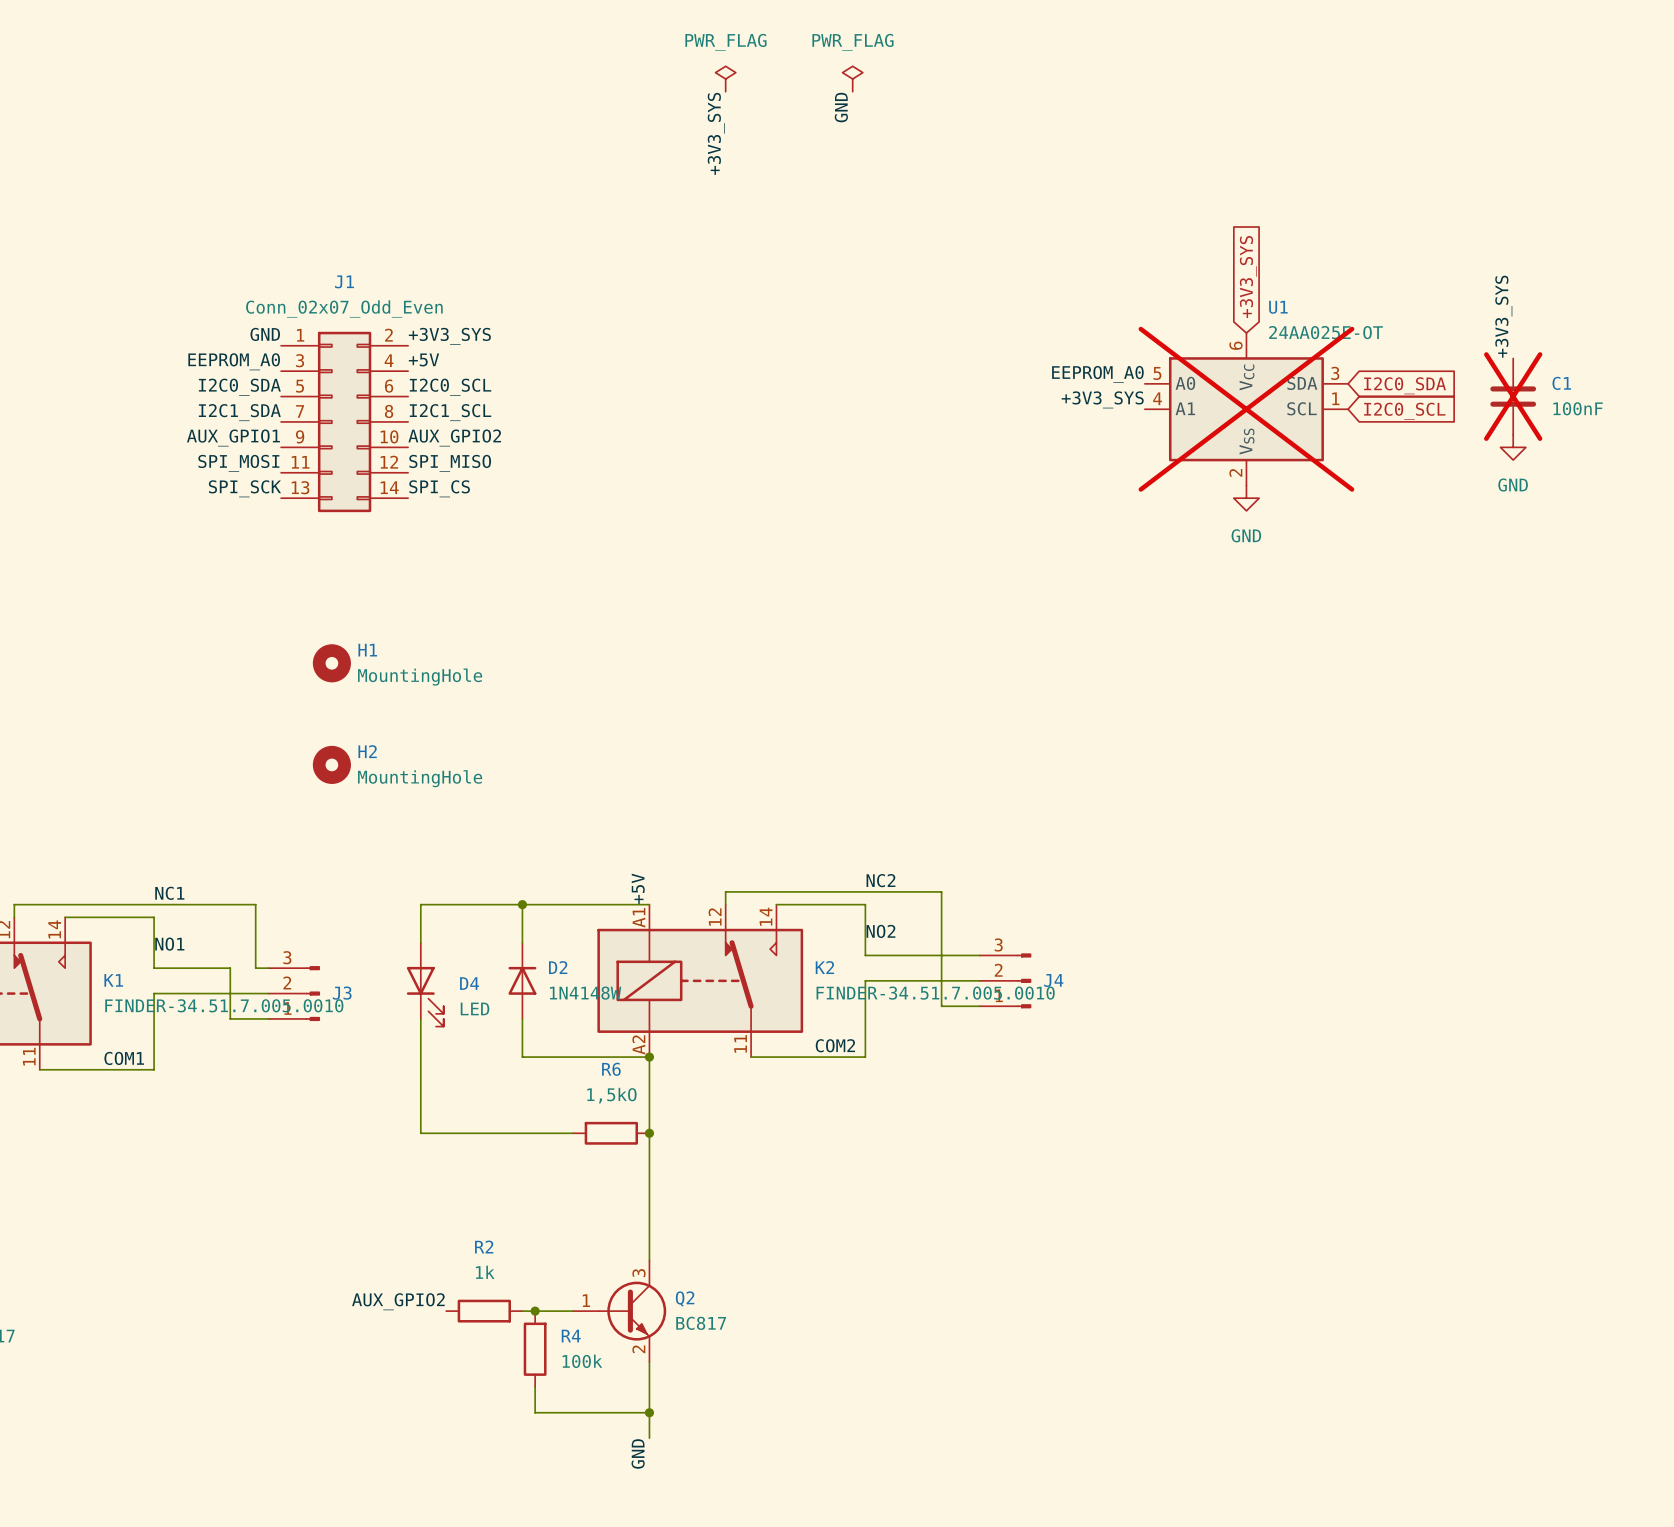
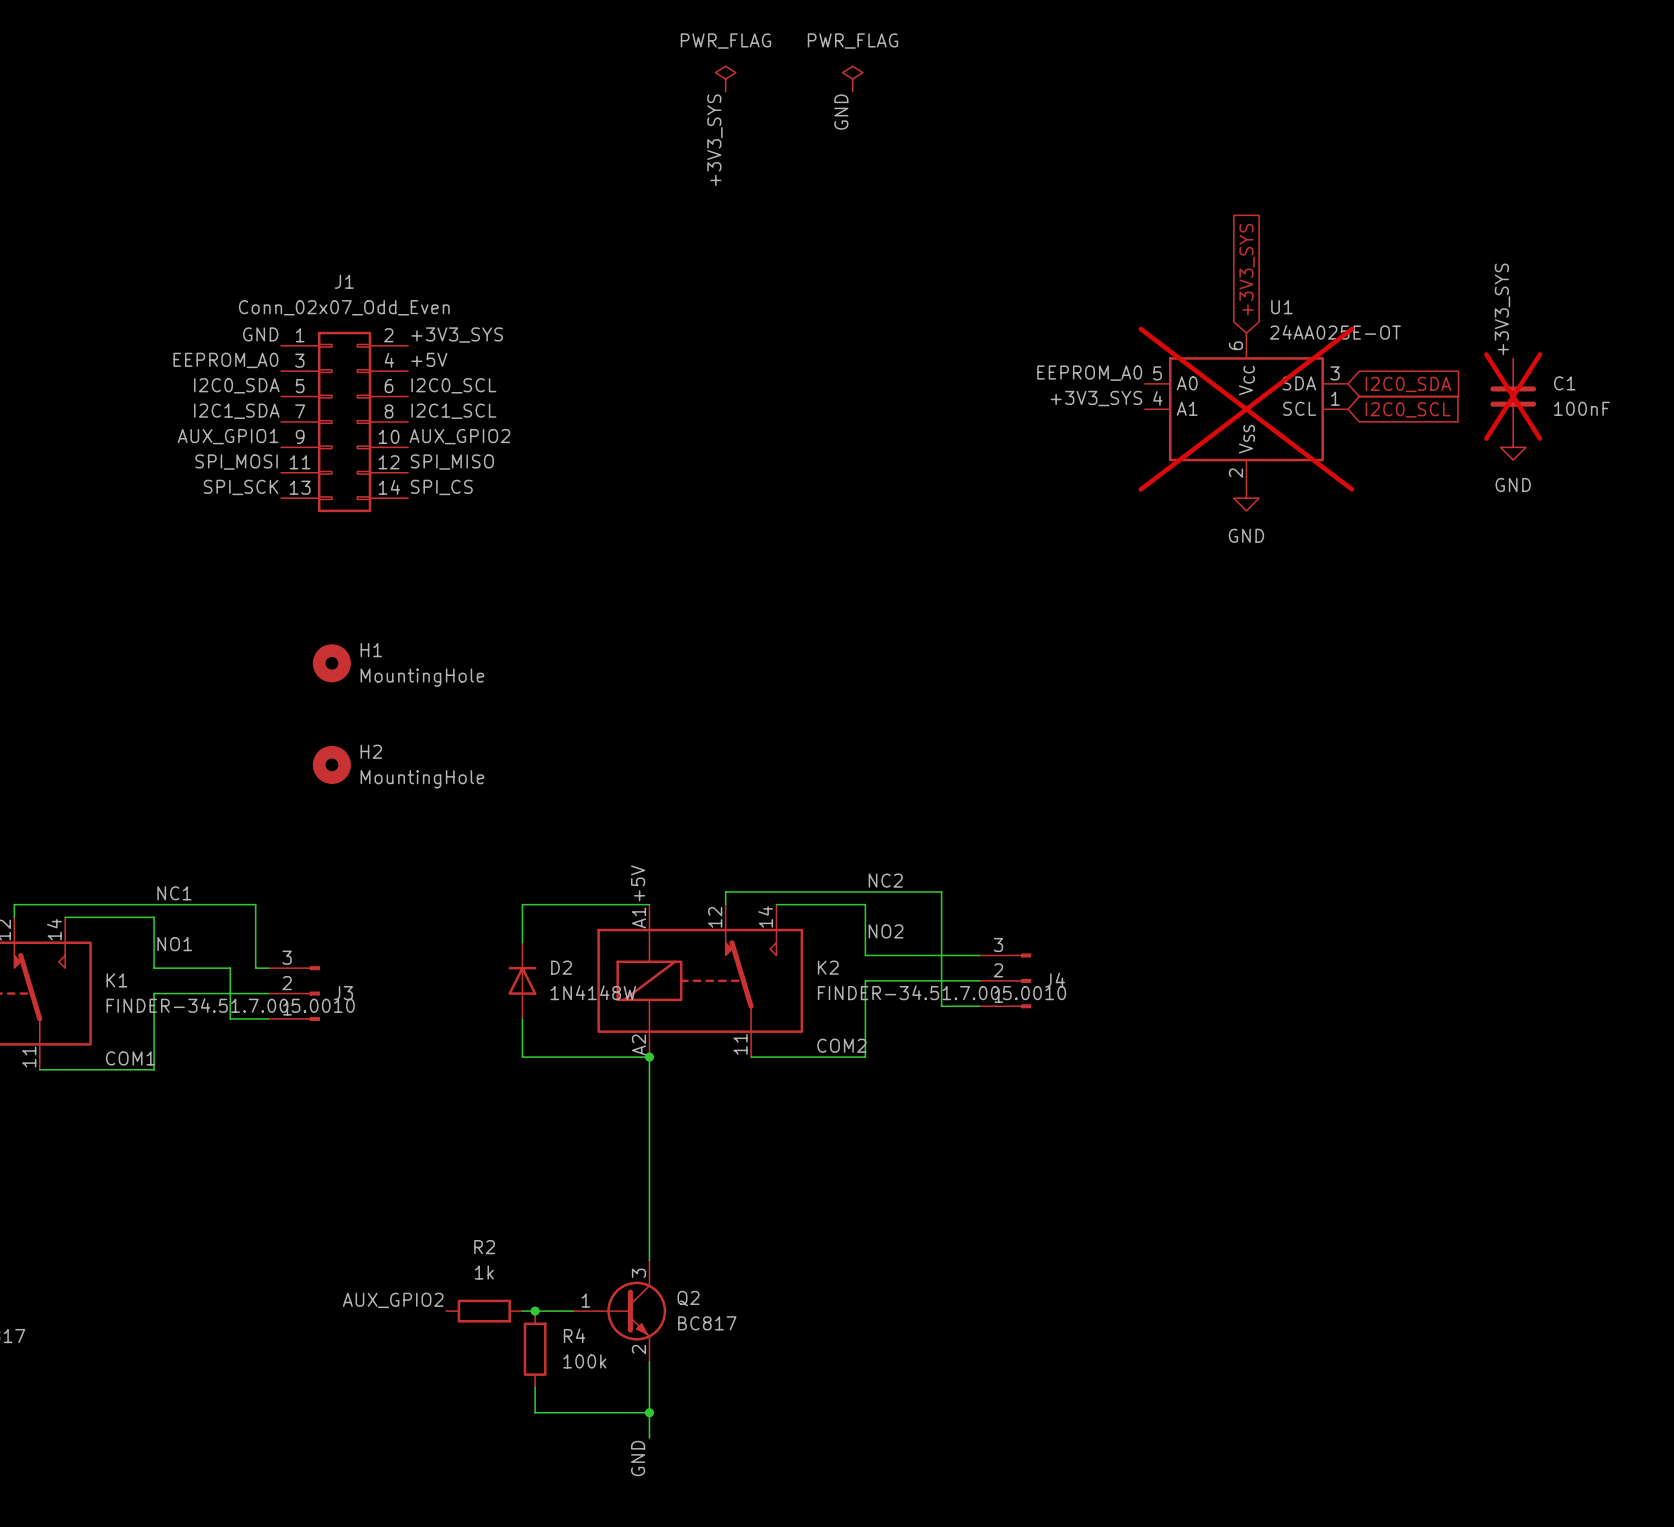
wire: (522, 904) (420, 904) (420, 942) -> none
junction: (522, 904) -> none
D4: LED (425, 984) -> none
wire: (420, 1018) (420, 1133) (573, 1133) -> none
R6: 1,5kO (611, 1133) -> none
junction: (649, 1133) -> none

